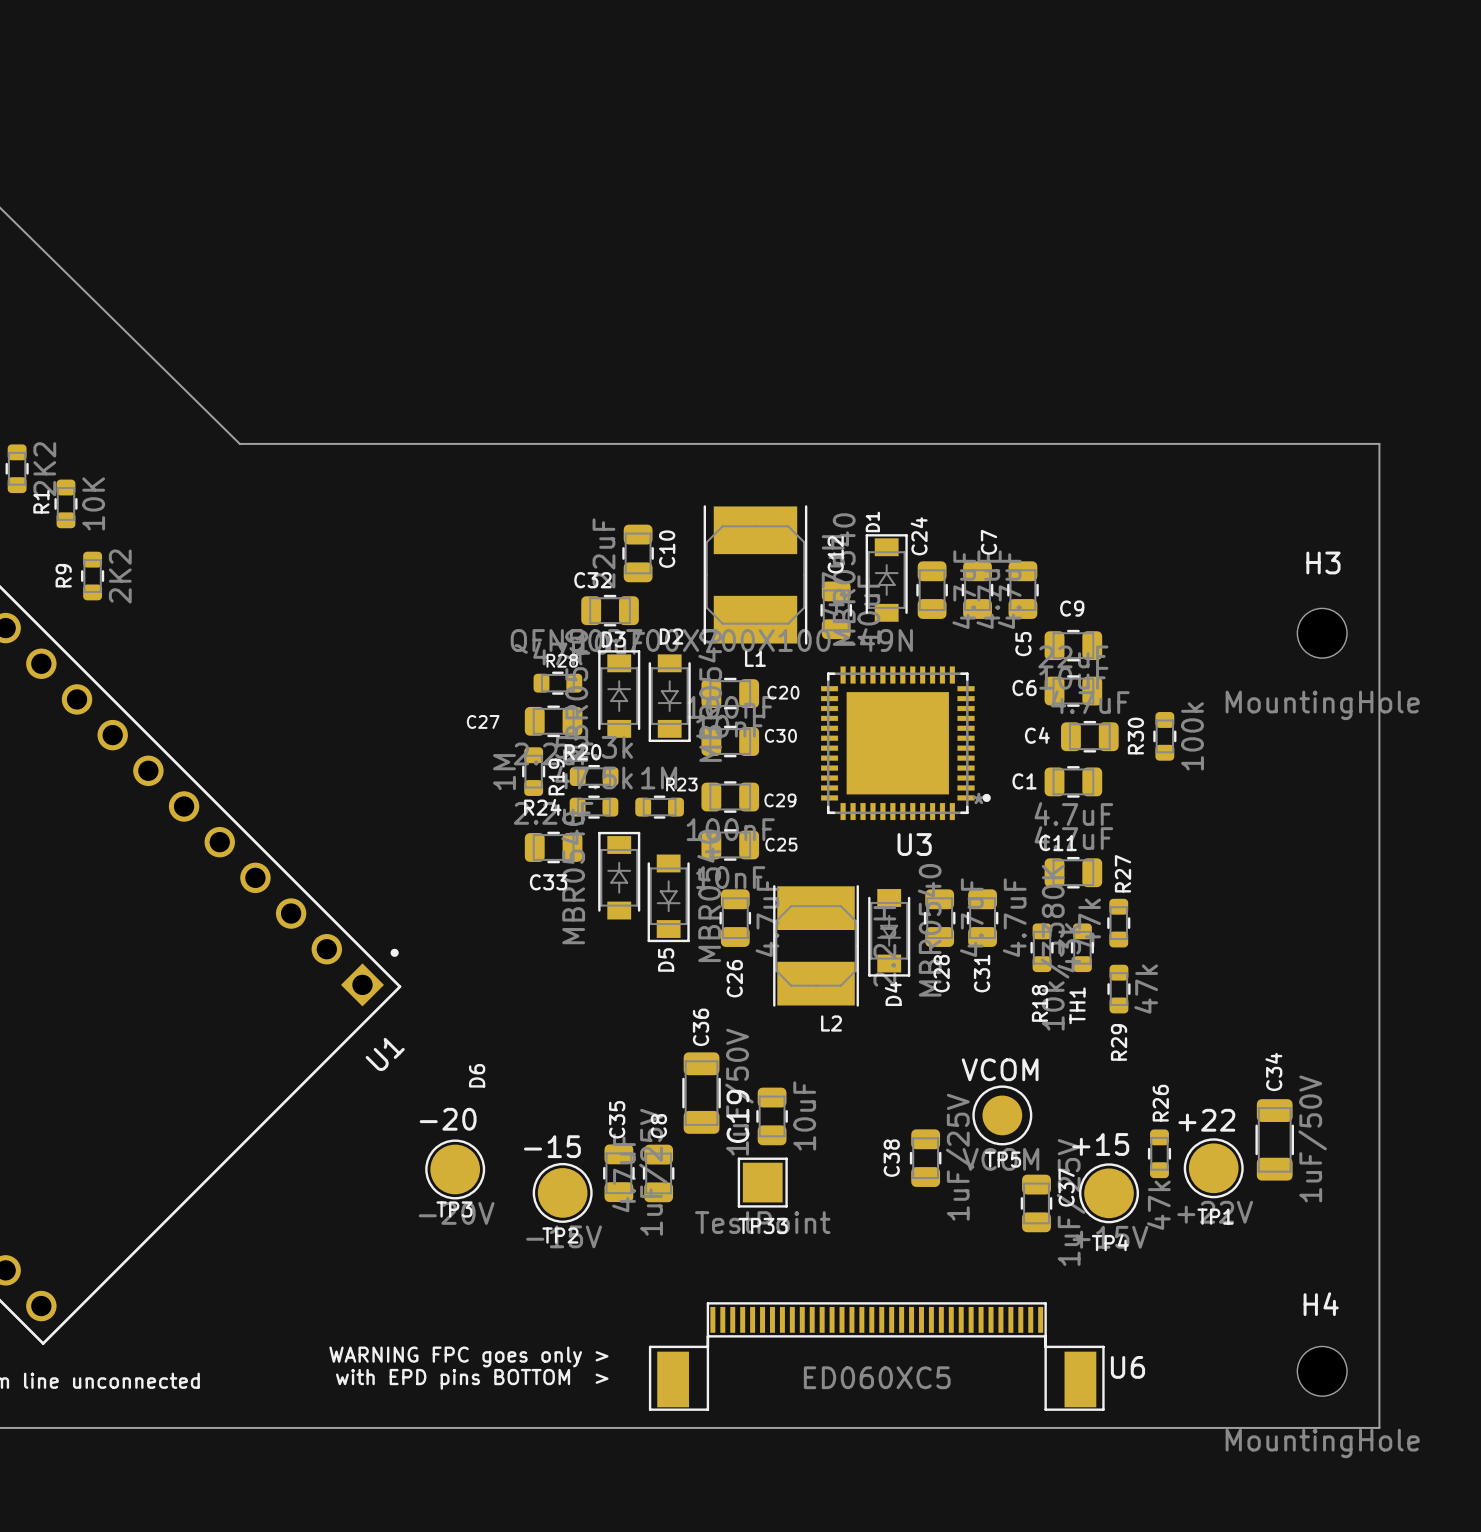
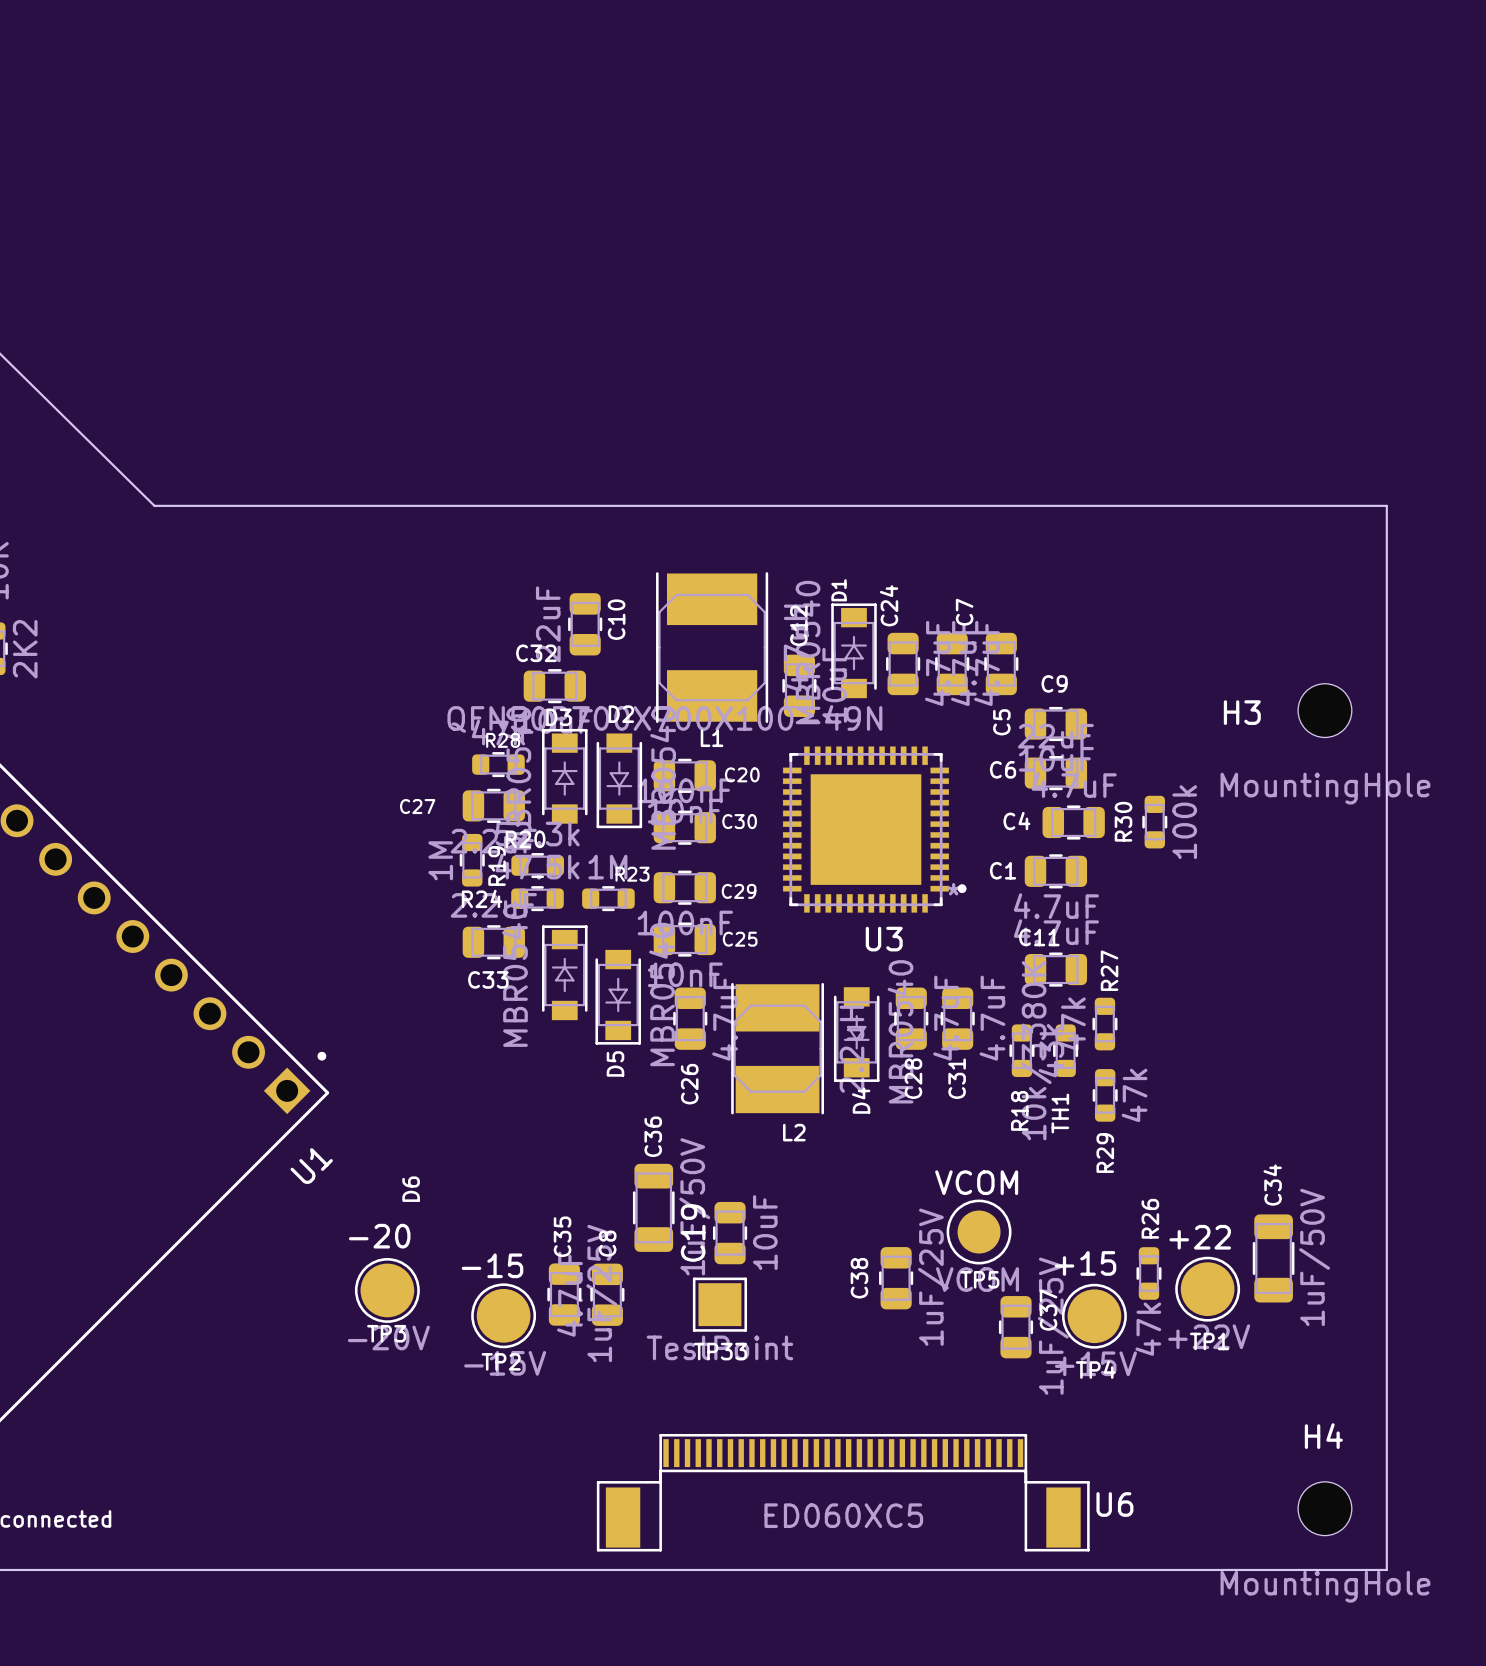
H3 name position: H3 (1323, 562) -> H3 (1242, 712)
text: WARNING FPC goes only > (468, 1356) -> none
text: with EPD pins BOTTOM > (472, 1379) -> none

